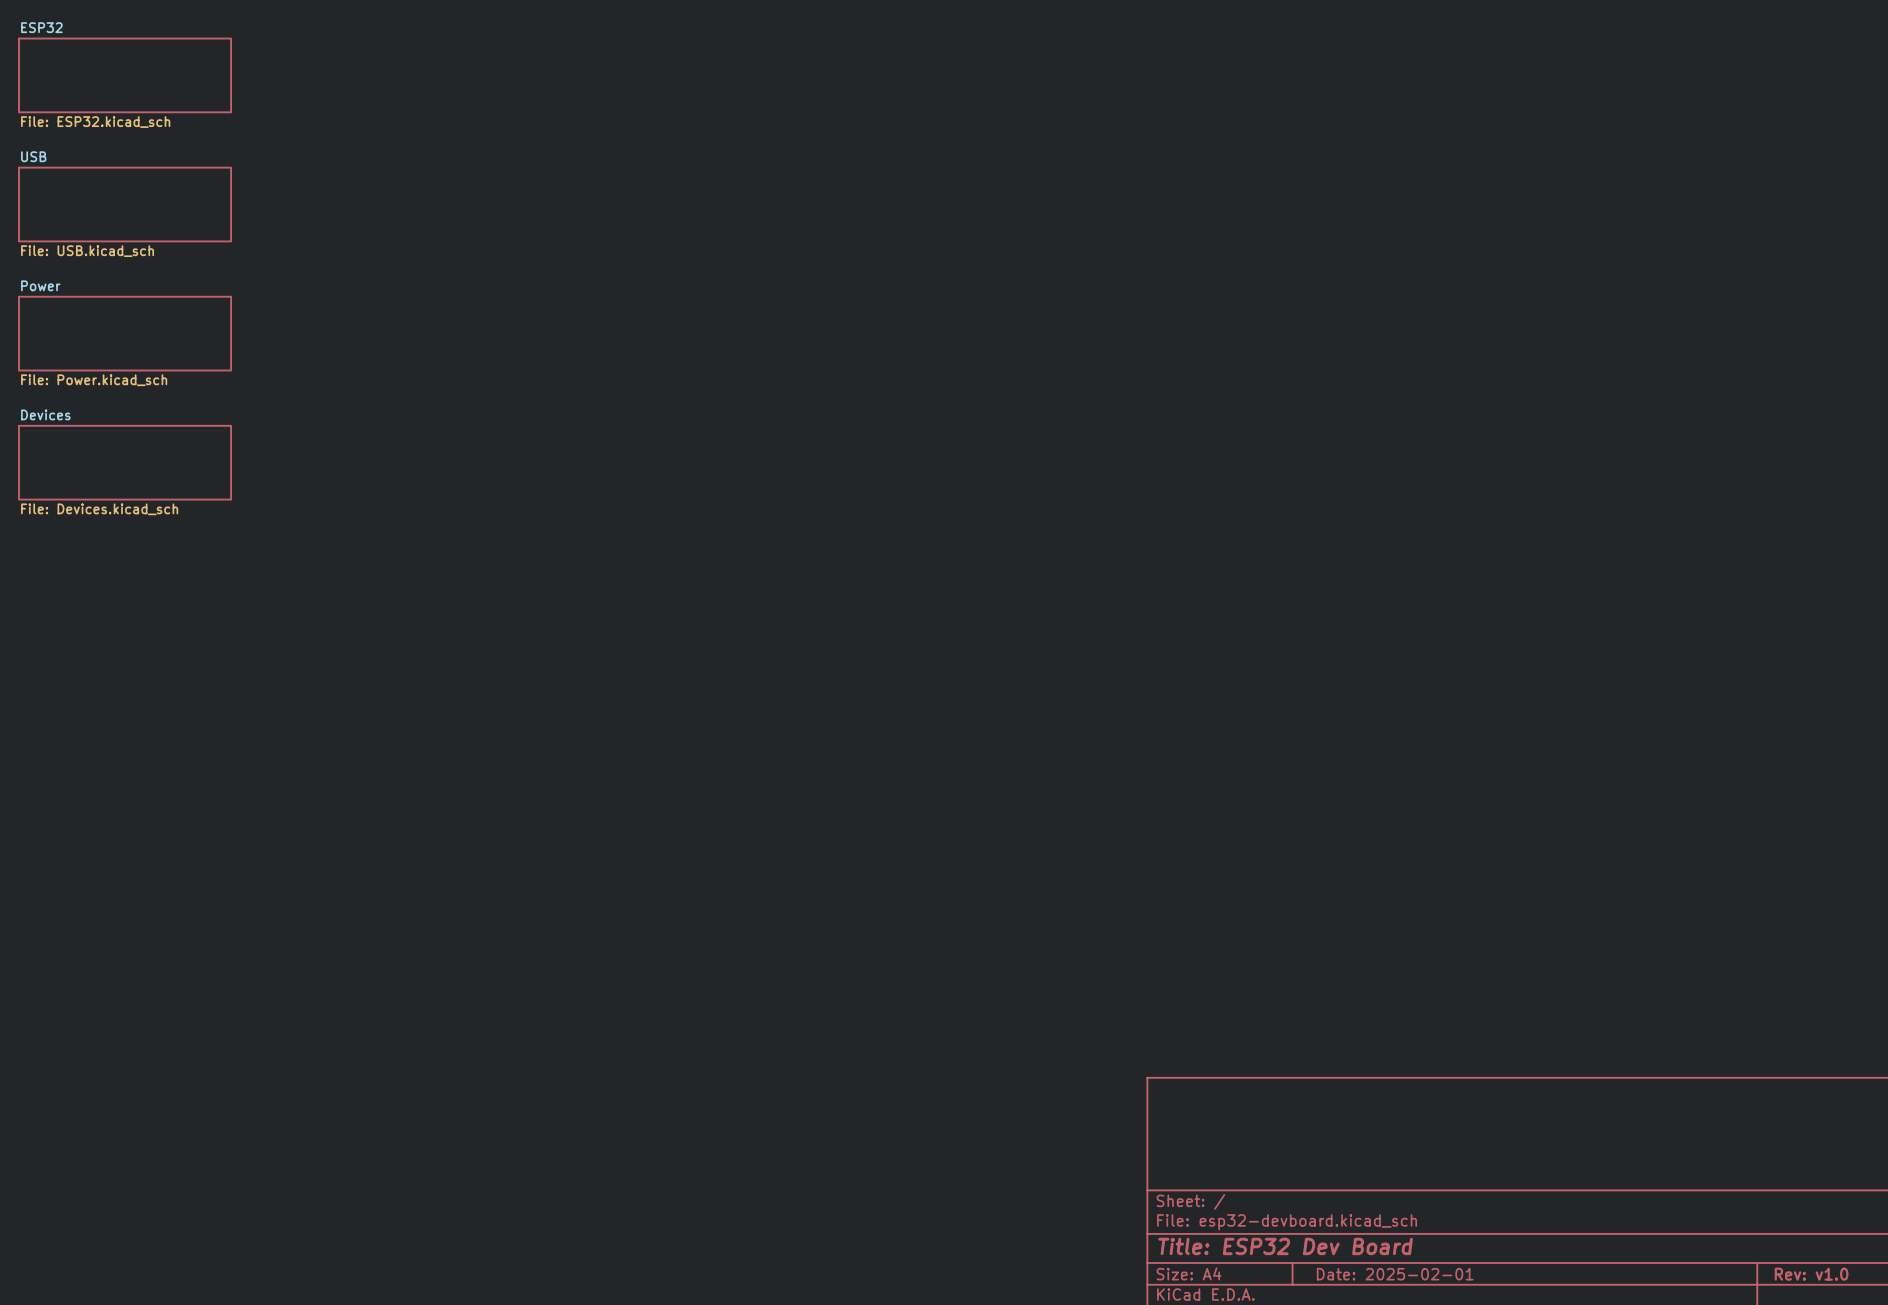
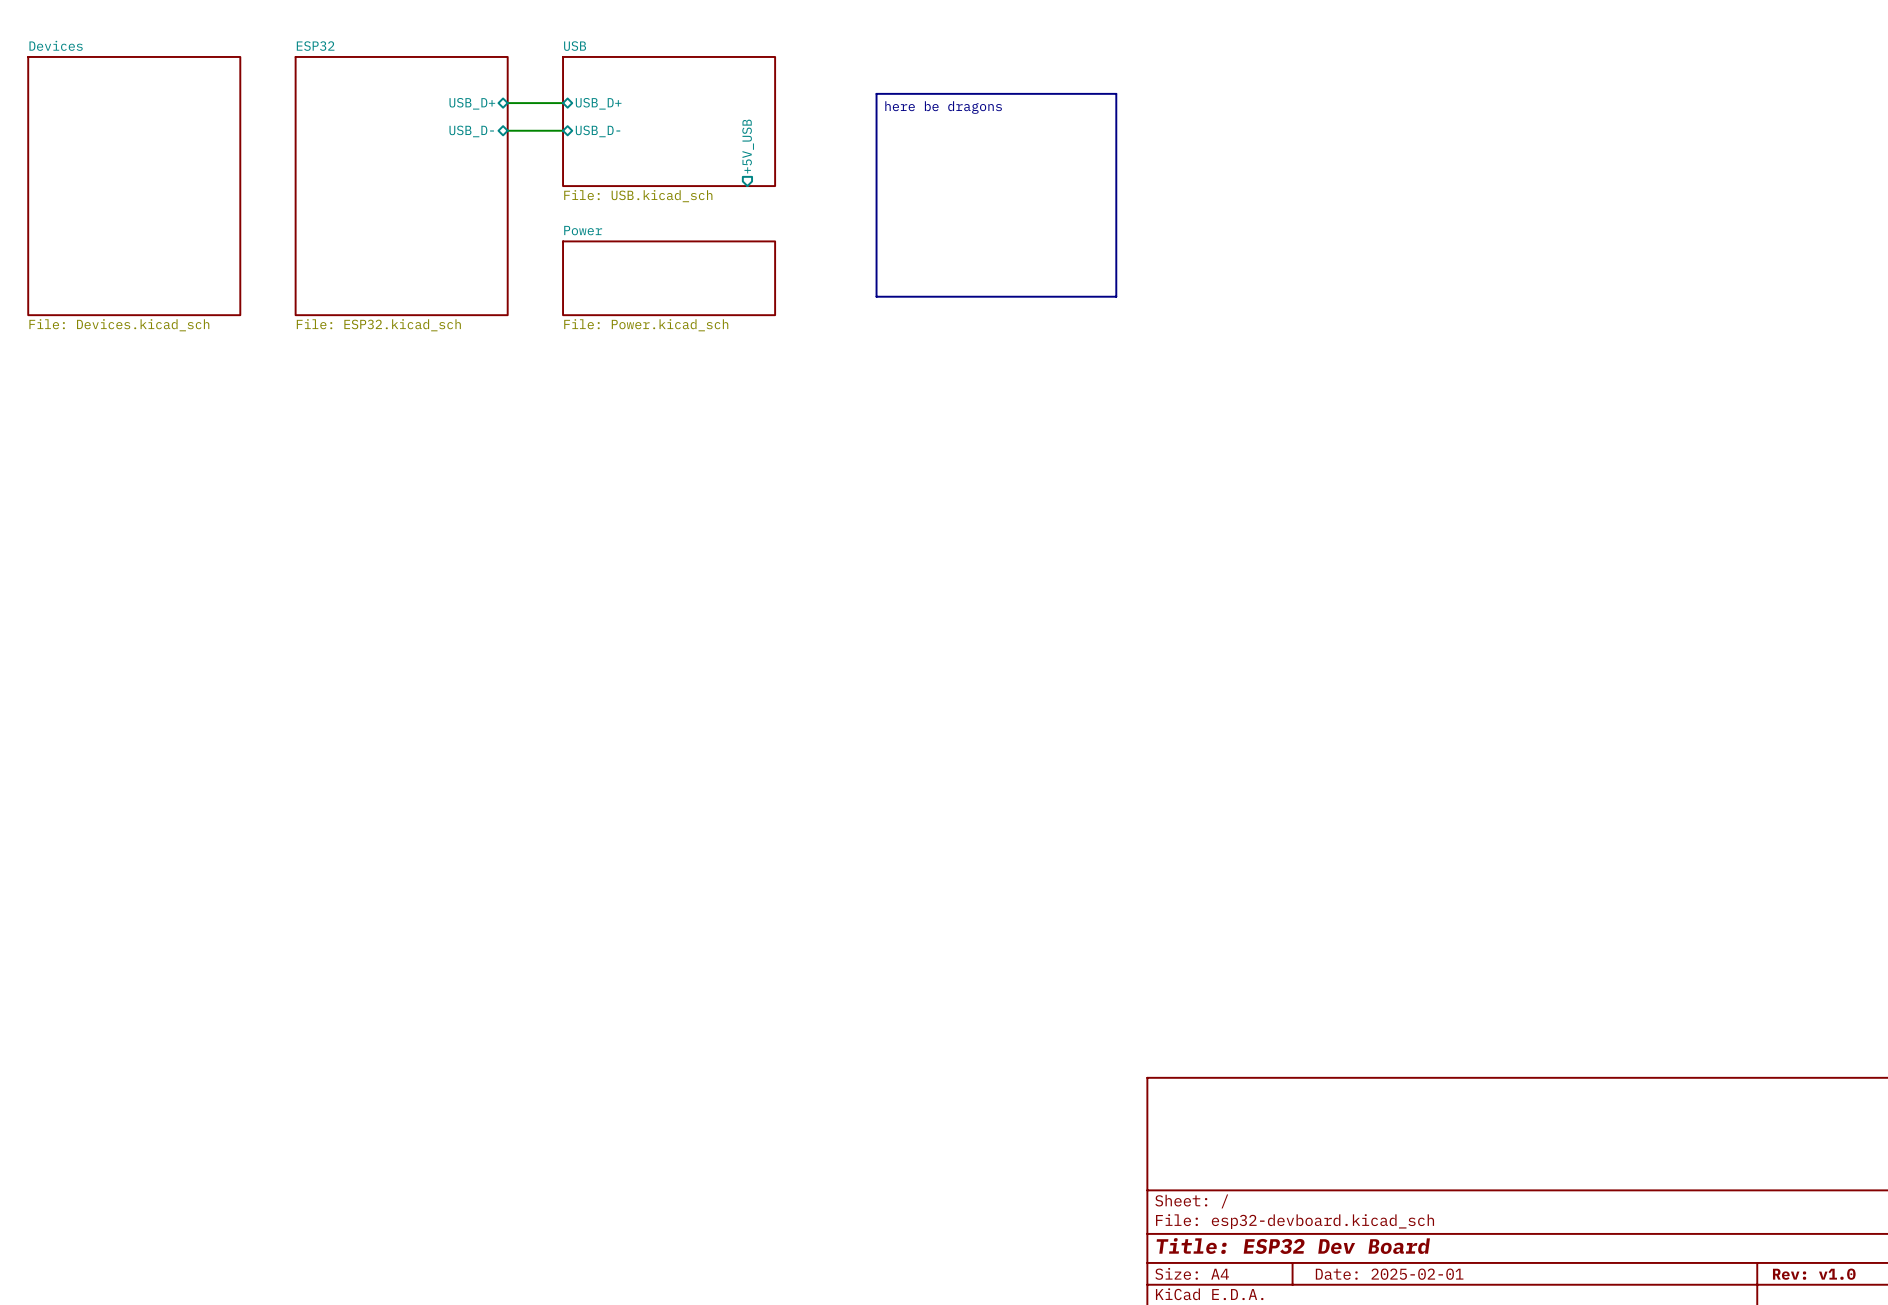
sheet ESP32 name position: ESP32 (41, 27) -> ESP32 (315, 46)
sheet ESP32 shape: [18, 37, 232, 113] -> [295, 56, 509, 316]
line: none -> (876, 93) (1116, 93) (1116, 296) (876, 296) (876, 93)
sheet pin: none -> USB_D+ (472, 103)
wire: none -> (507, 103) (563, 103)
sheet pin: none -> USB_D+ (598, 103)
text: none -> here be dragons (943, 107)
sheet USB: none -> File: USB.kicad_sch (669, 121)
sheet ESP32 value position: File: ESP32.kicad_sch (95, 122) -> File: ESP32.kicad_sch (378, 325)
sheet pin: none -> USB_D- (471, 131)
wire: none -> (507, 130) (563, 130)
sheet pin: none -> USB_D- (598, 131)
sheet pin: none -> +5V_USB (748, 146)
sheet Devices: none -> File: Devices.kicad_sch (134, 186)
sheet USB: File: USB.kicad_sch (125, 204) -> none
sheet Power: none -> File: Power.kicad_sch (669, 278)
sheet Power: File: Power.kicad_sch (125, 333) -> none
sheet Devices: File: Devices.kicad_sch (125, 462) -> none

